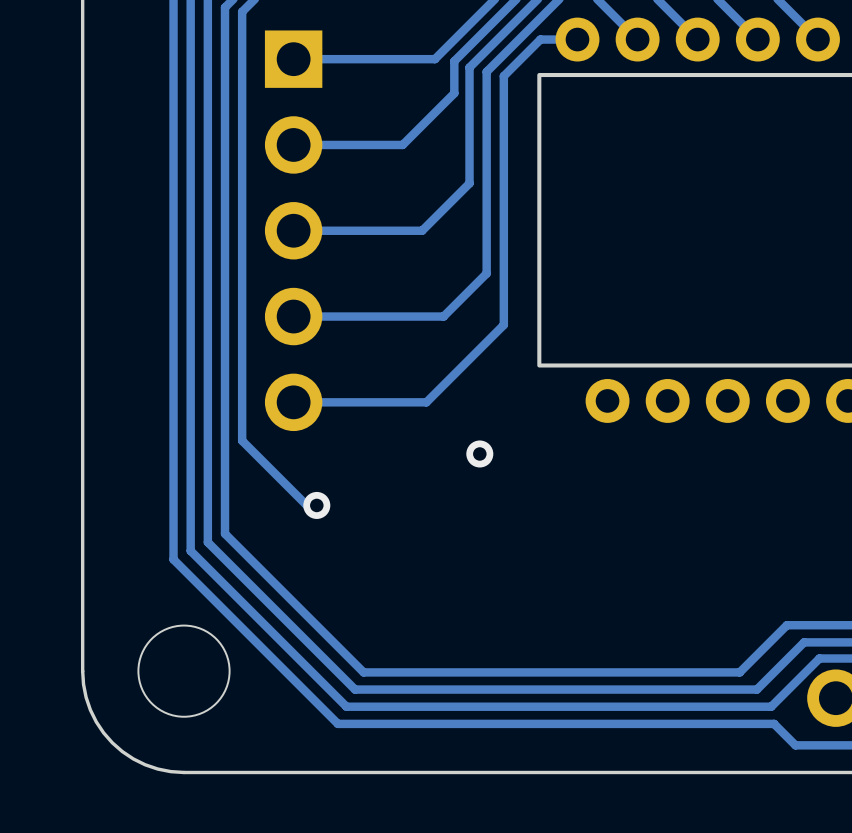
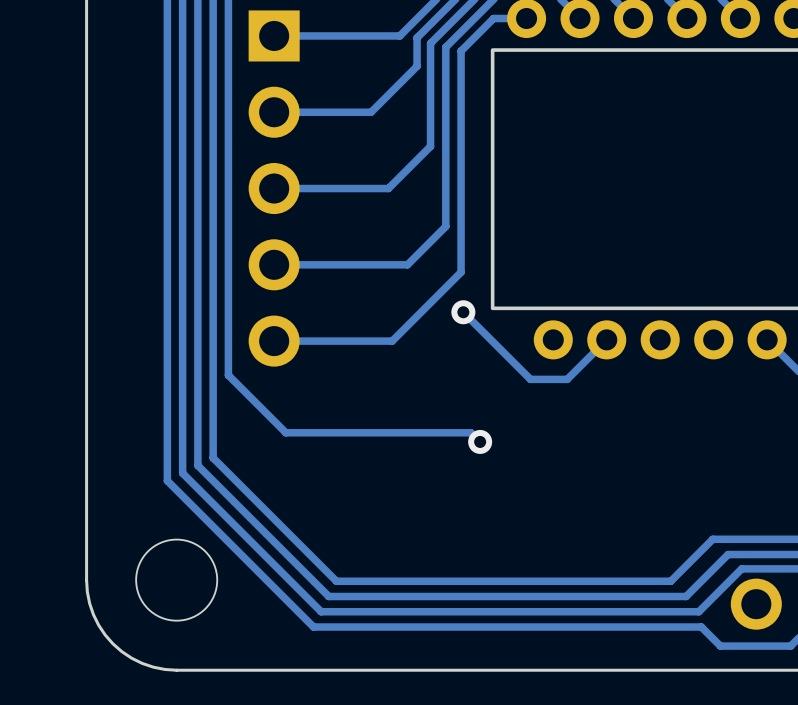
track: none -> (463, 312) (530, 379) (567, 379) (606, 339)
via: none -> (463, 312)
via: (479, 453) -> none
track: none -> (294, 432) (470, 432) (480, 441)
via: (316, 505) -> none
via: none -> (480, 441)

